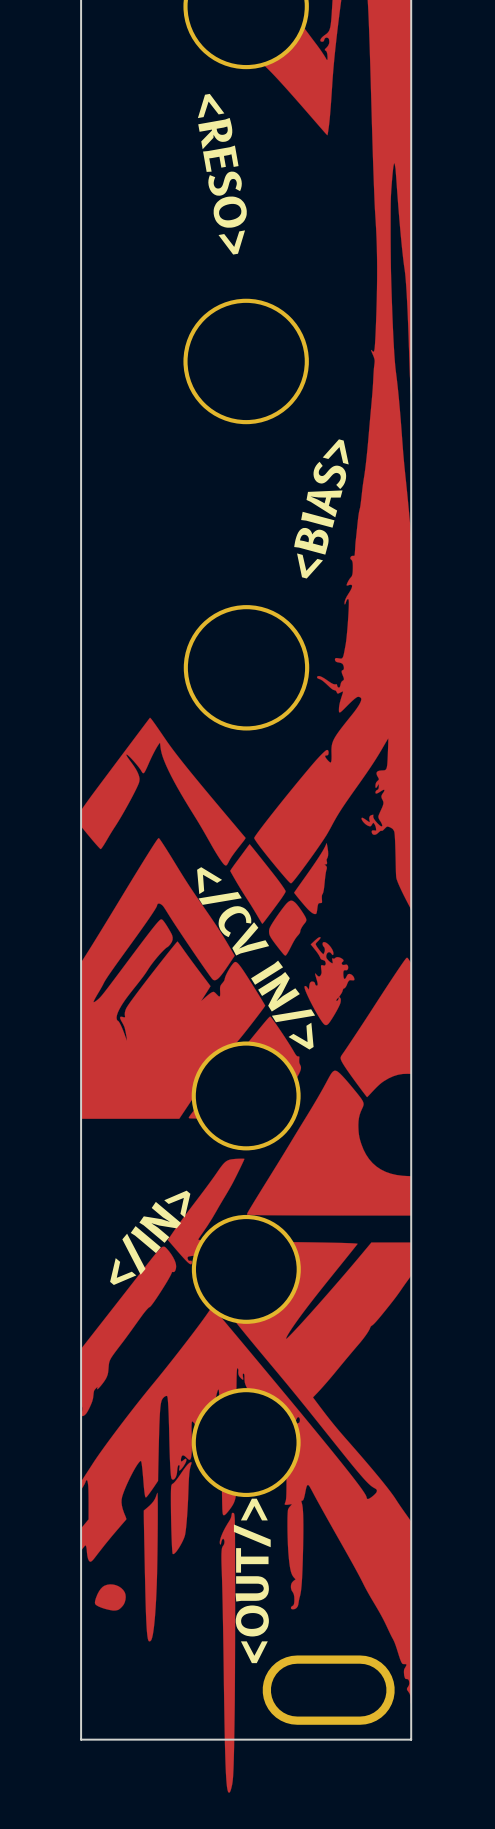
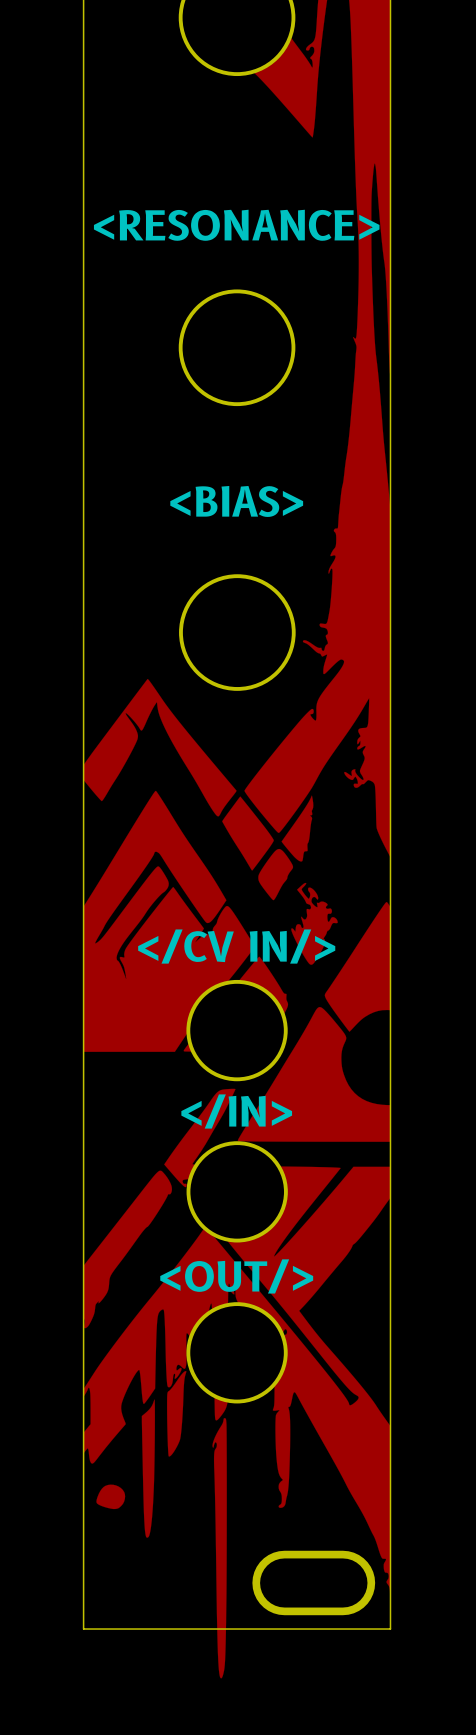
text: <RESO> (222, 174) -> <RESONANCE> (236, 225)
text rotation: 0° (321, 508) -> 75° clockwise (236, 501)
text rotation: 0° (256, 958) -> 58° counterclockwise (236, 946)
text rotation: 0° (150, 1237) -> 50° clockwise (236, 1111)
text rotation: 0° (252, 1580) -> 90° clockwise (236, 1276)

